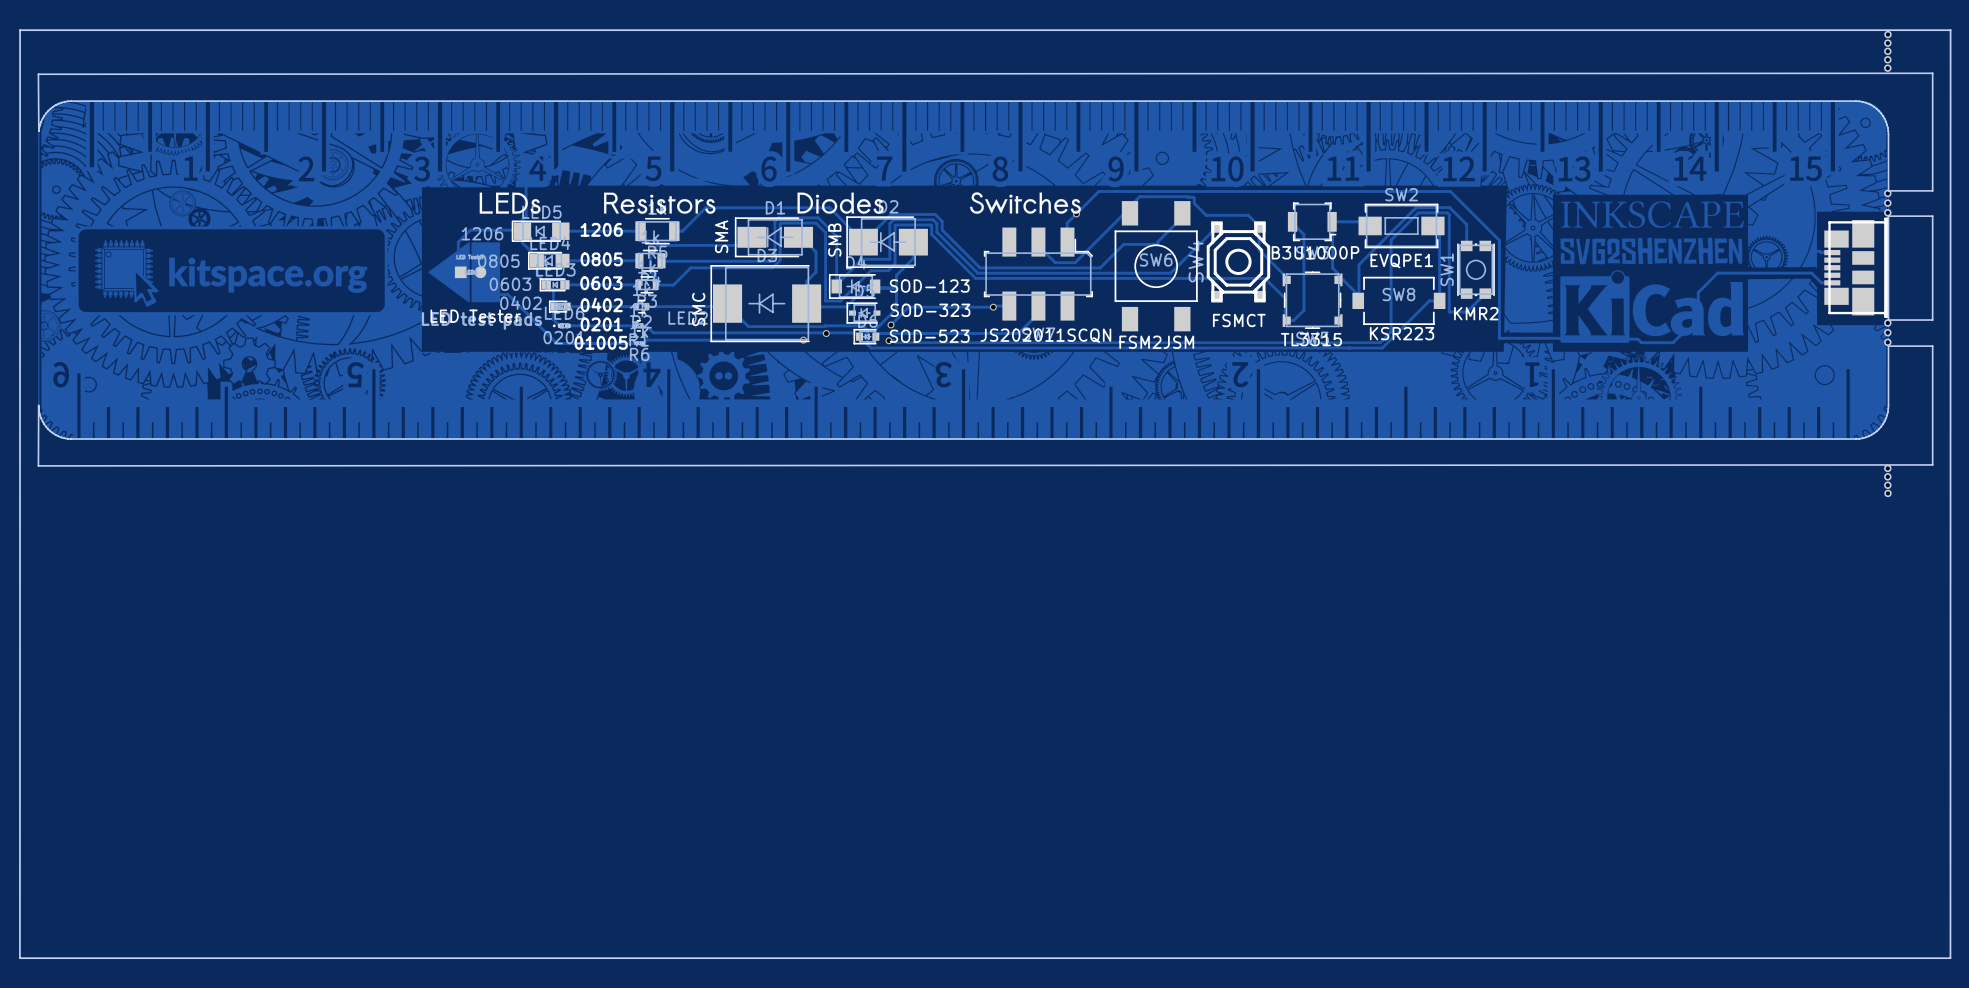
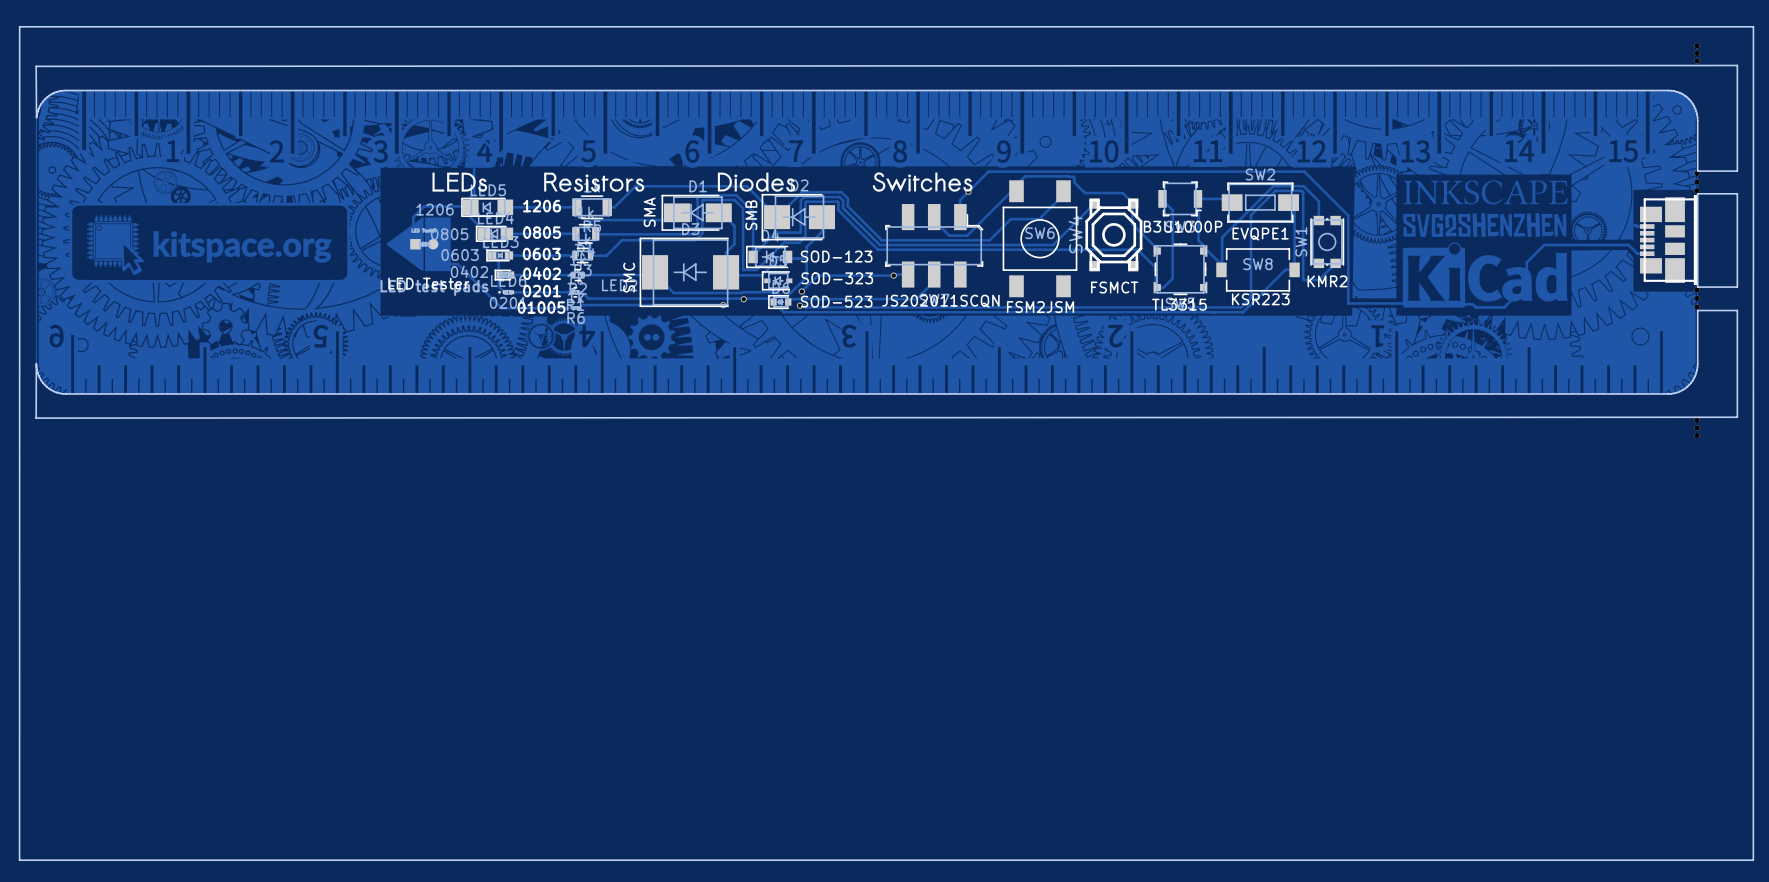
part footprint: [37, 31, 1934, 497] -> [35, 43, 1738, 439]

